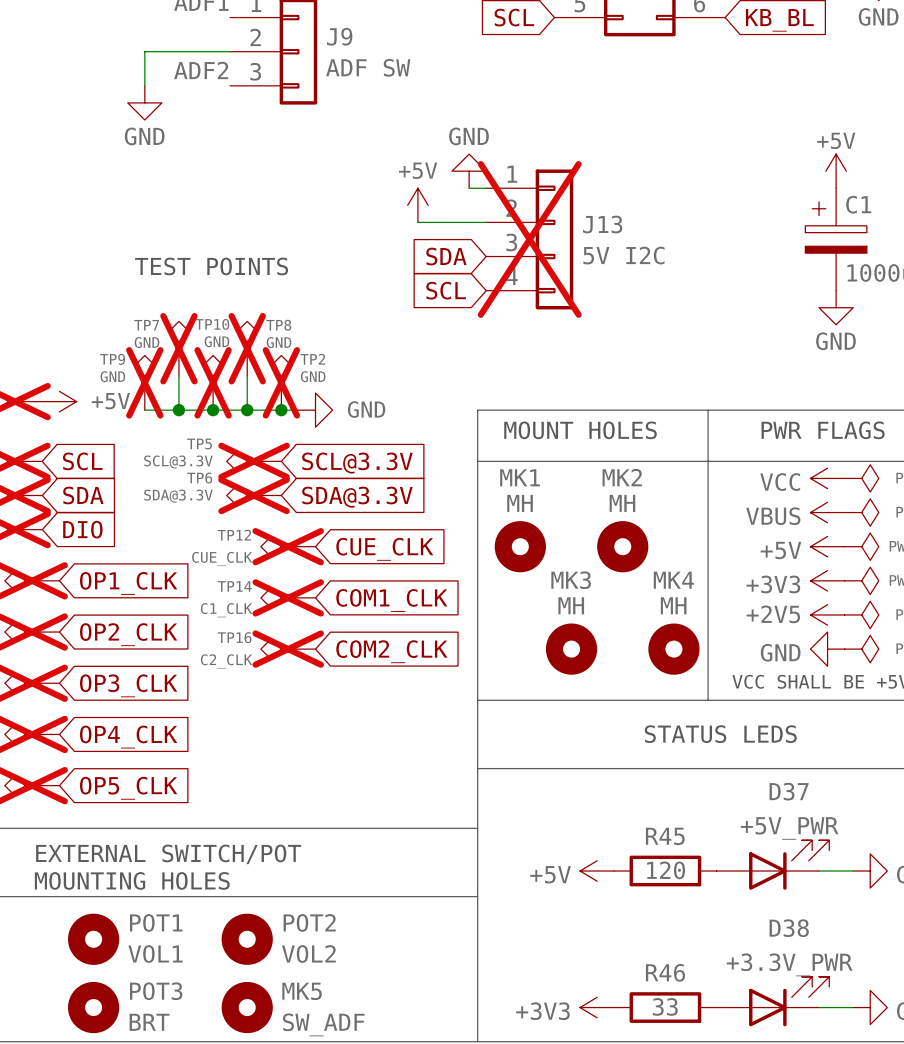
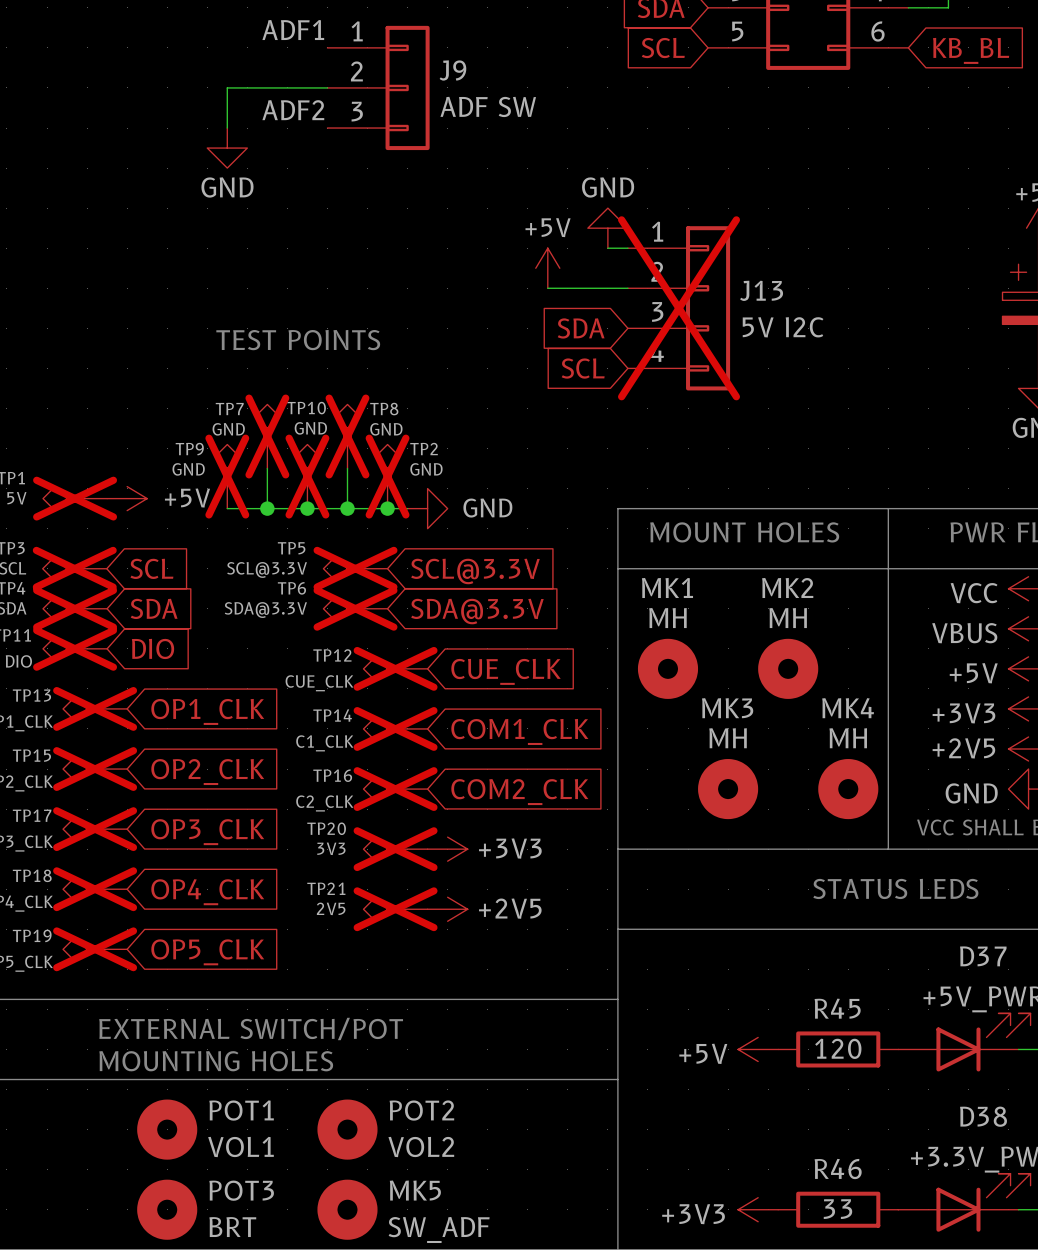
TP20: none -> 3V3 (395, 849)
power symbol: none -> +3V3 (447, 849)
TP21: none -> 2V5 (395, 909)
power symbol: none -> +2V5 (447, 909)

